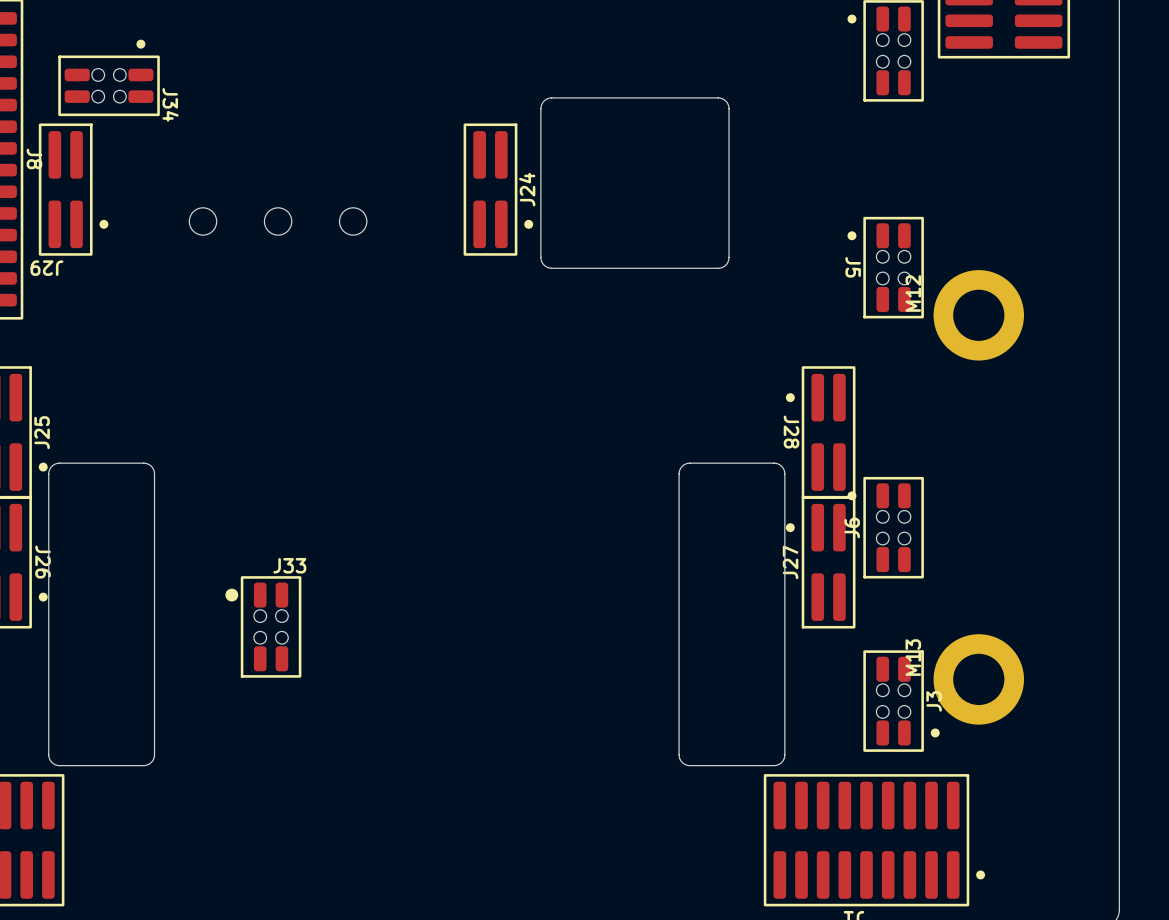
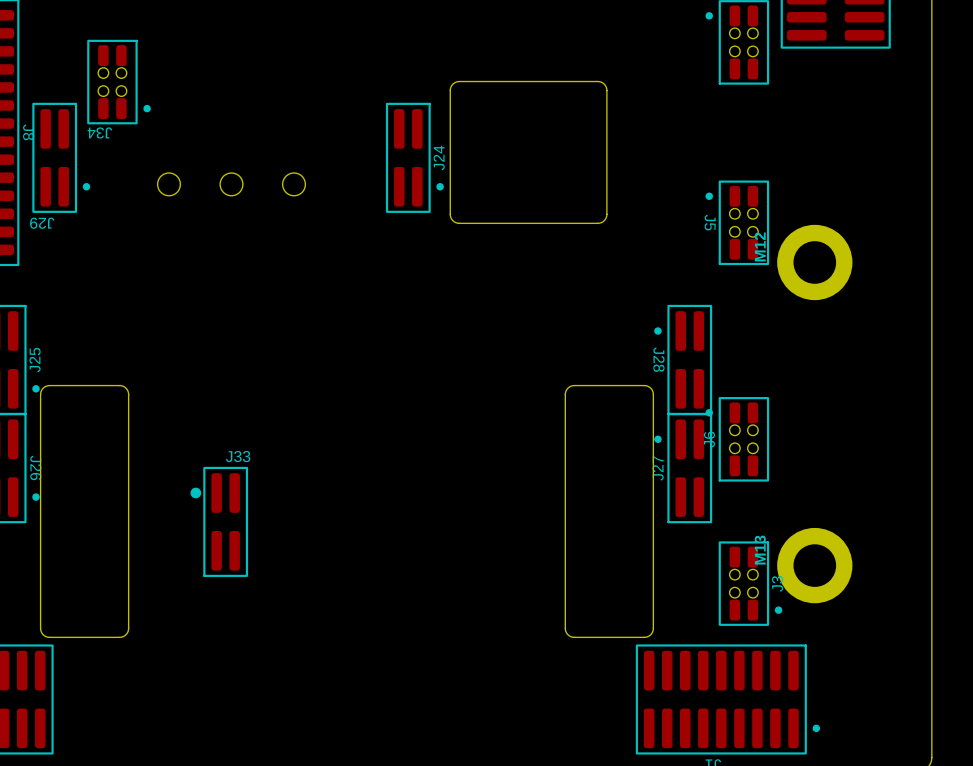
J34 rotation: 0° (109, 77) -> 90° clockwise (119, 82)
J33 footprint: [225, 576, 302, 678] -> [190, 466, 249, 577]

